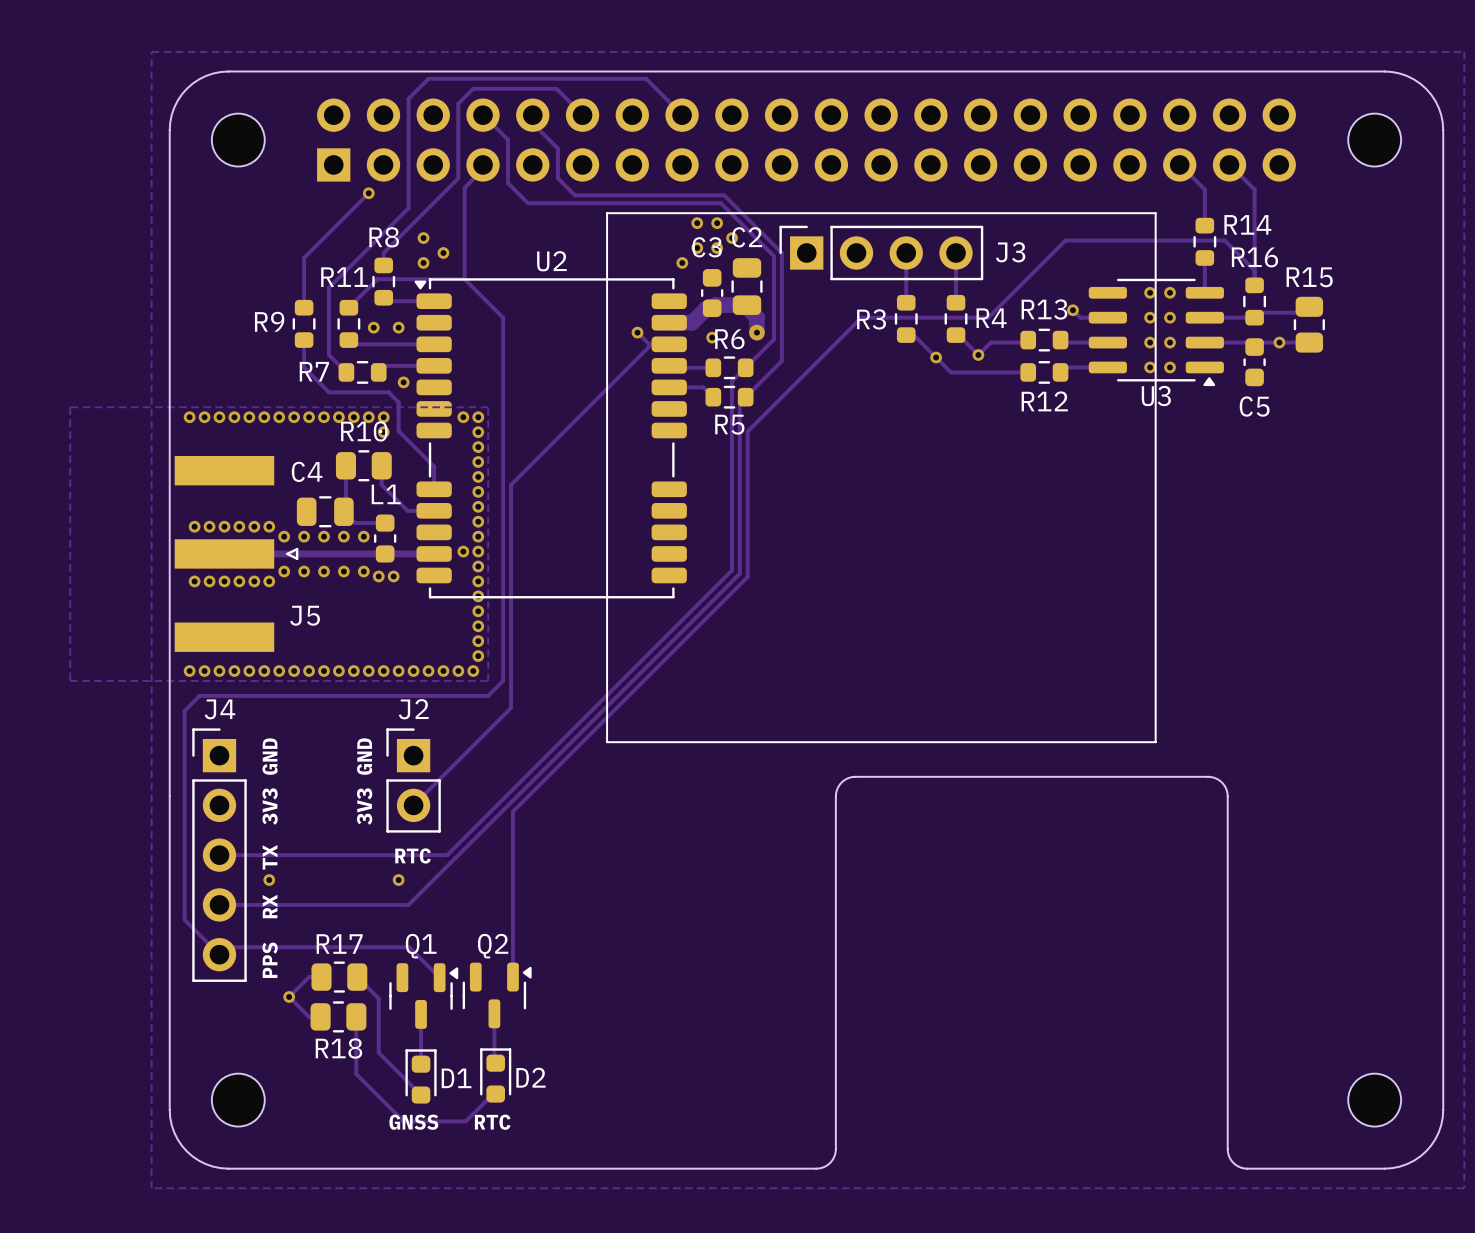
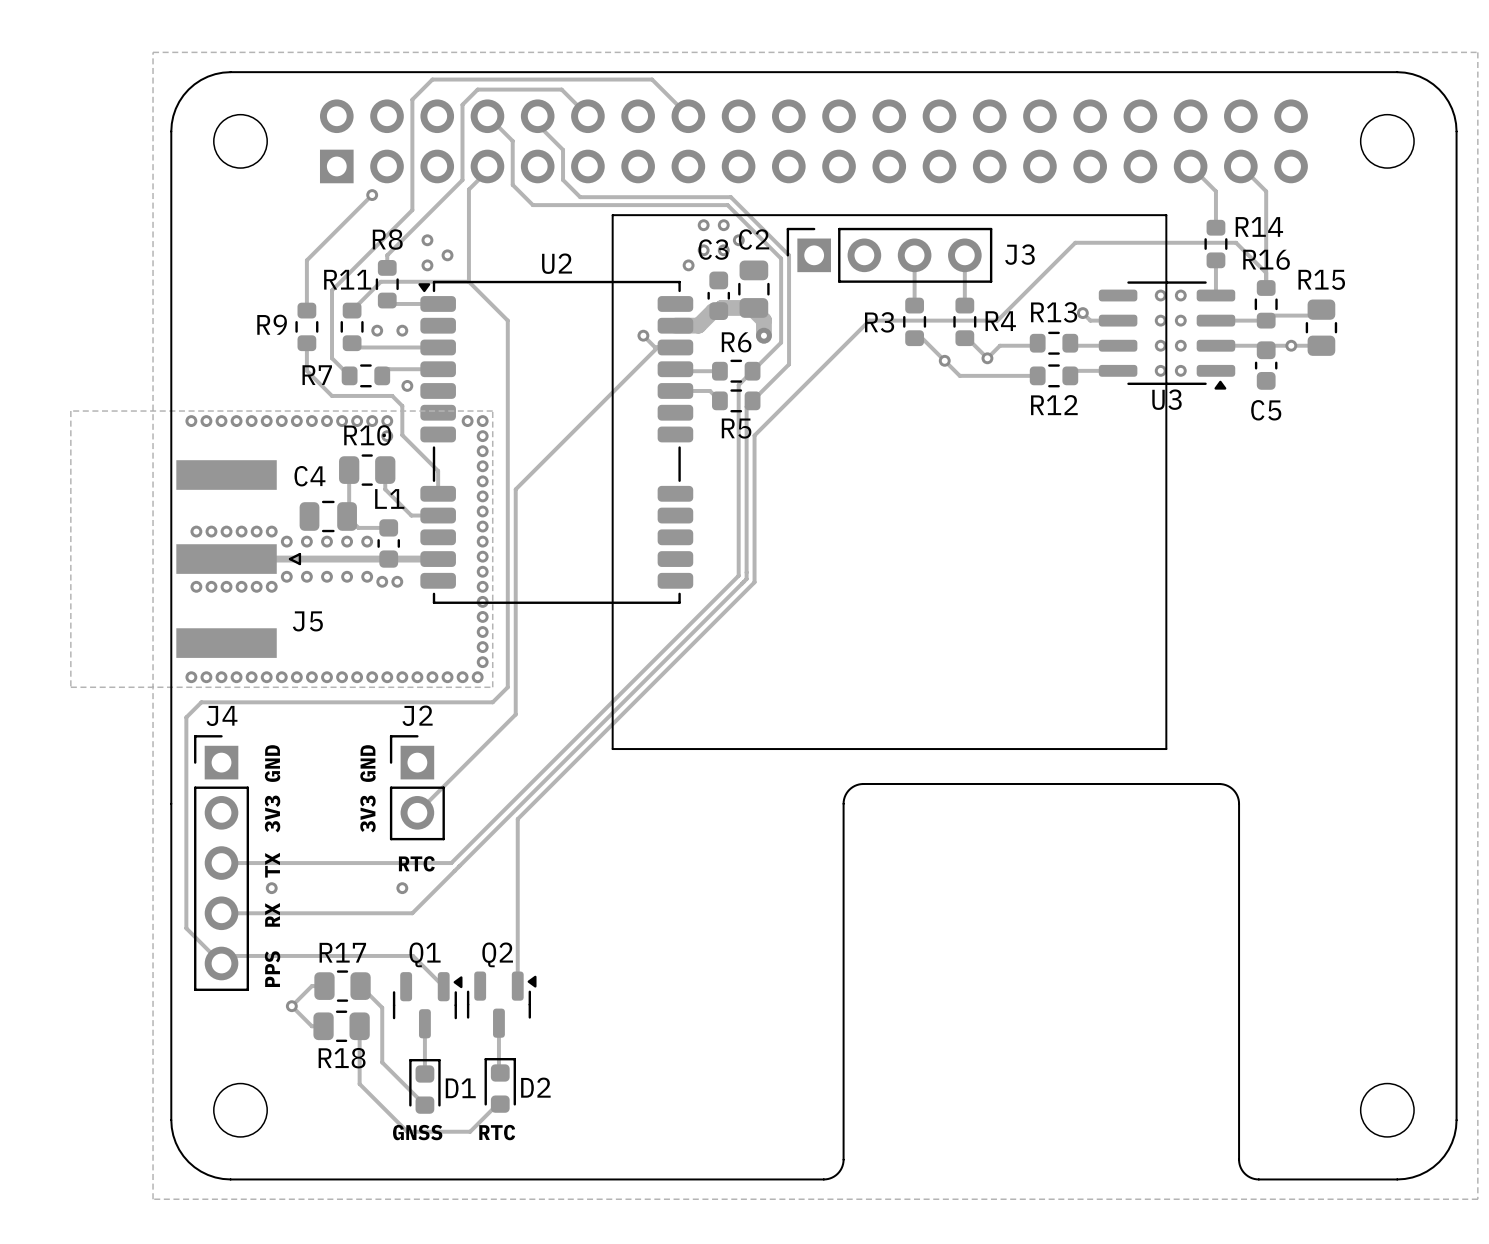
via: (712, 337) -> none
via: (463, 551) -> none

